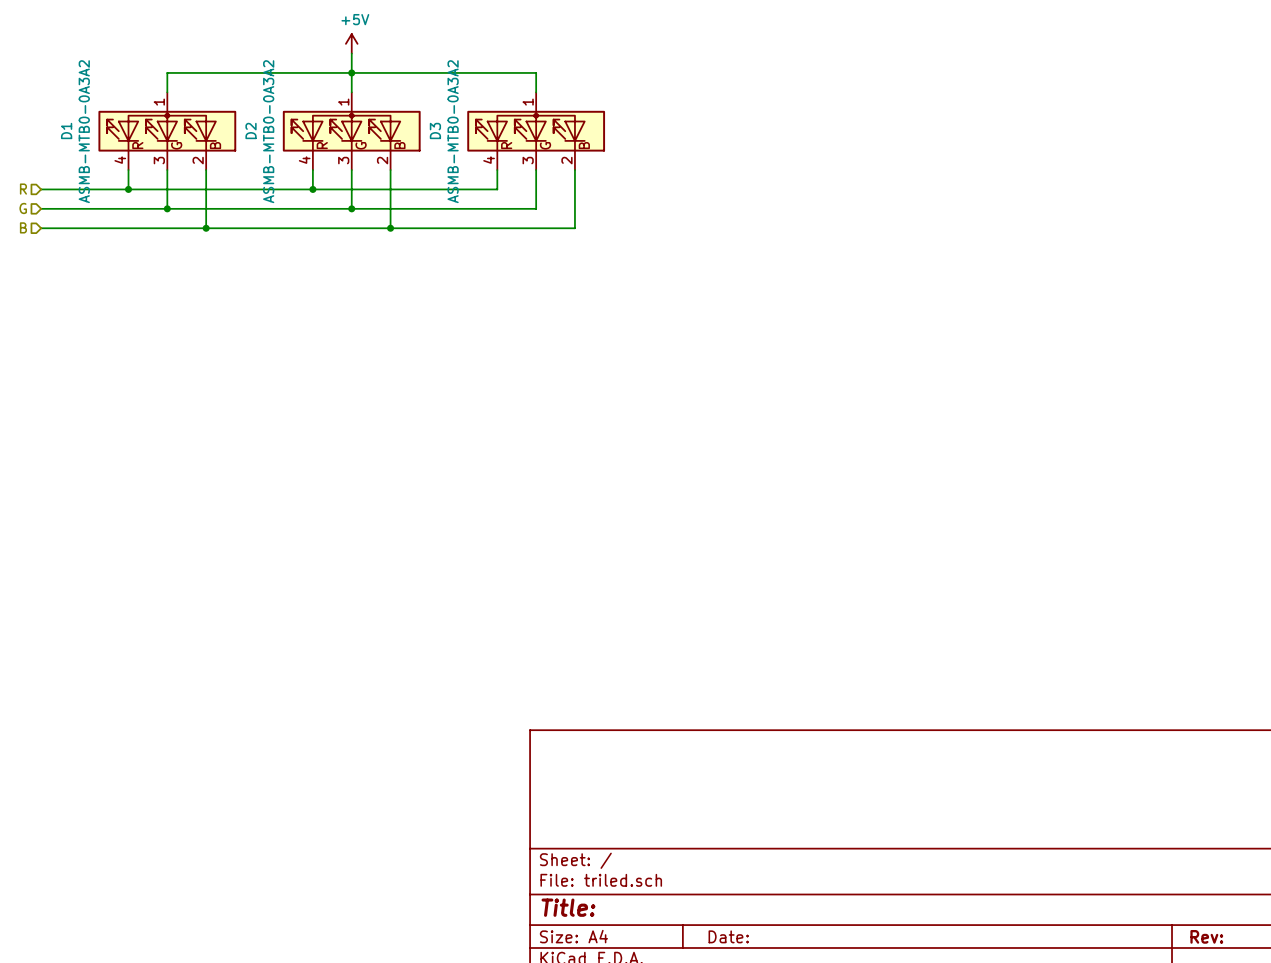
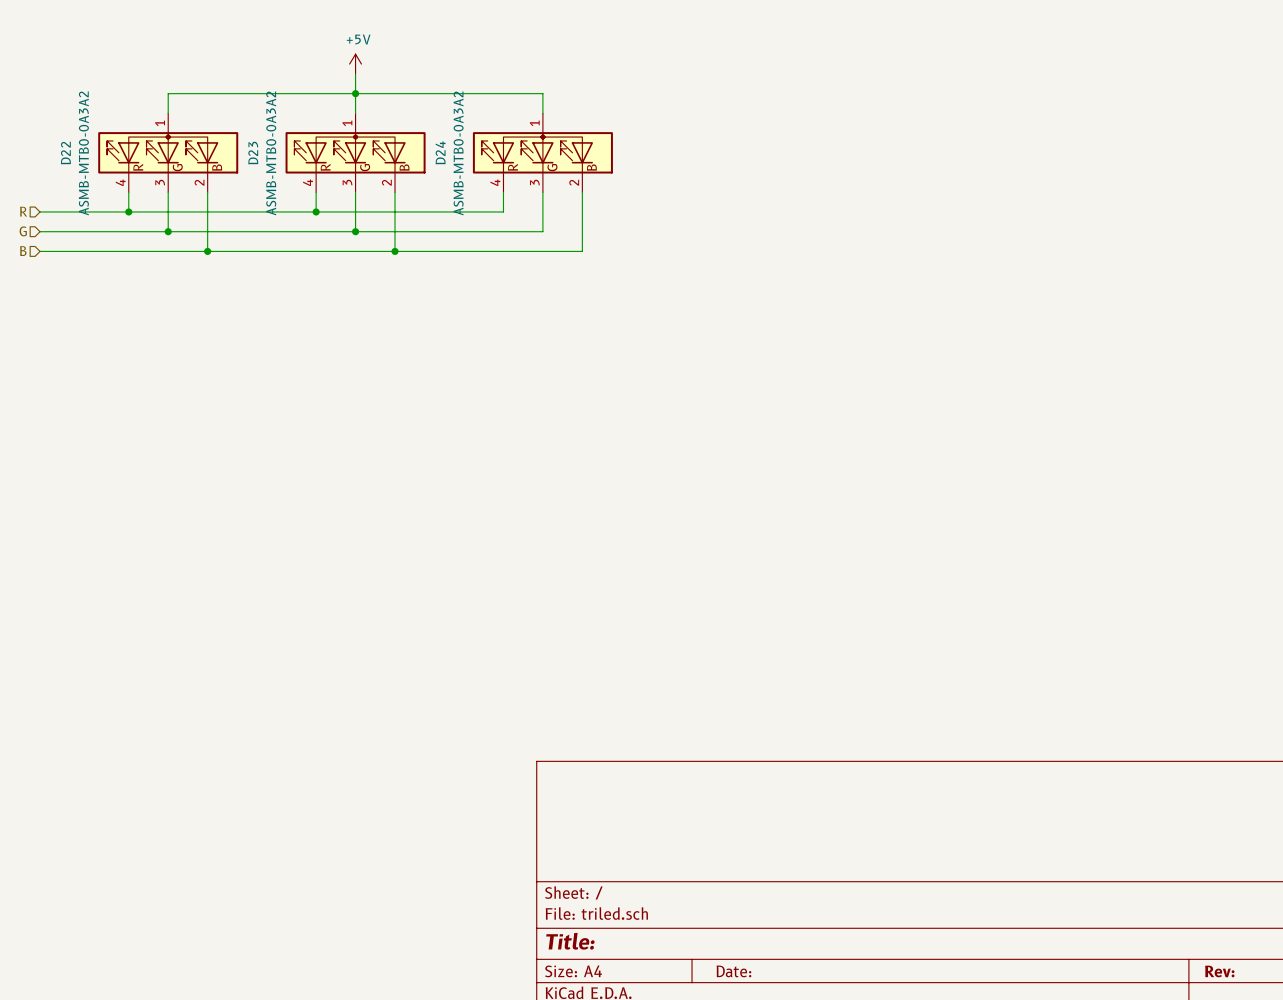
D1 name: D1 (66, 130) -> D22 (65, 153)
D2 name: D2 (251, 130) -> D23 (253, 153)
D3 name: D3 (435, 130) -> D24 (440, 152)

